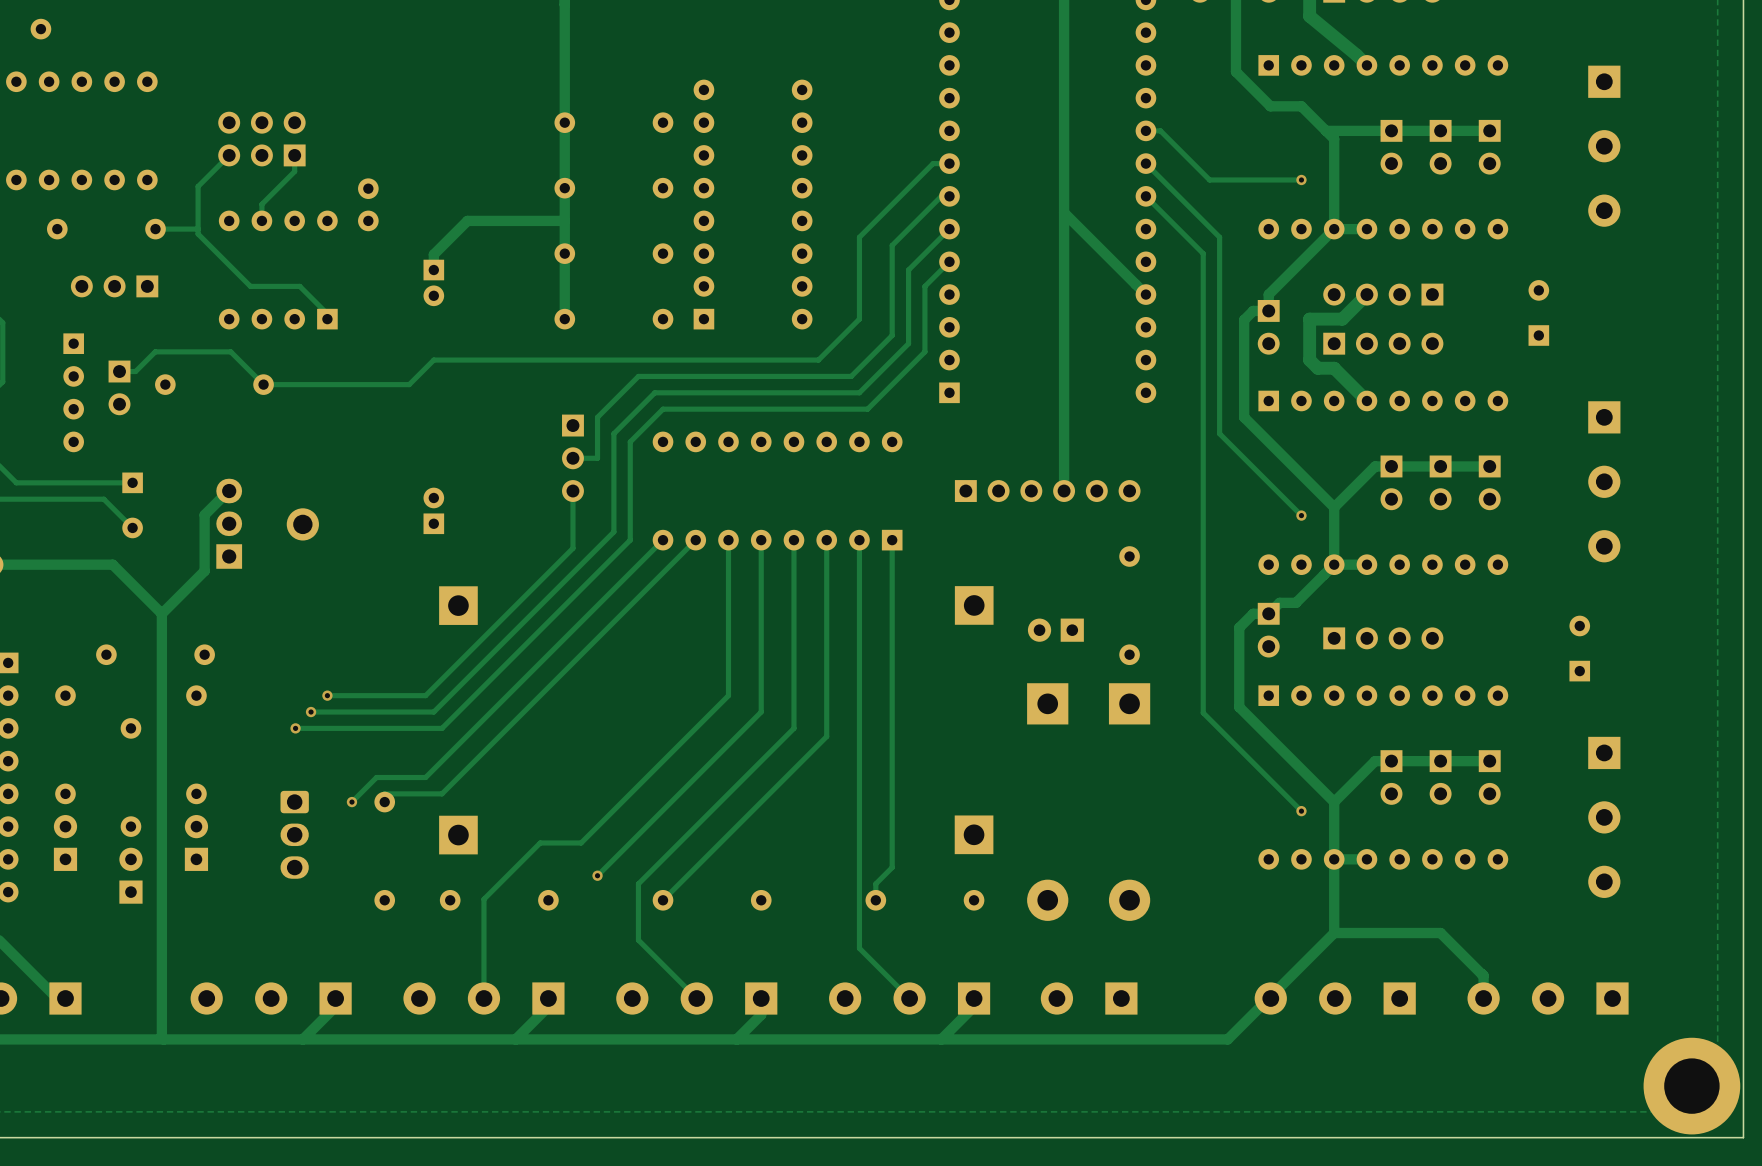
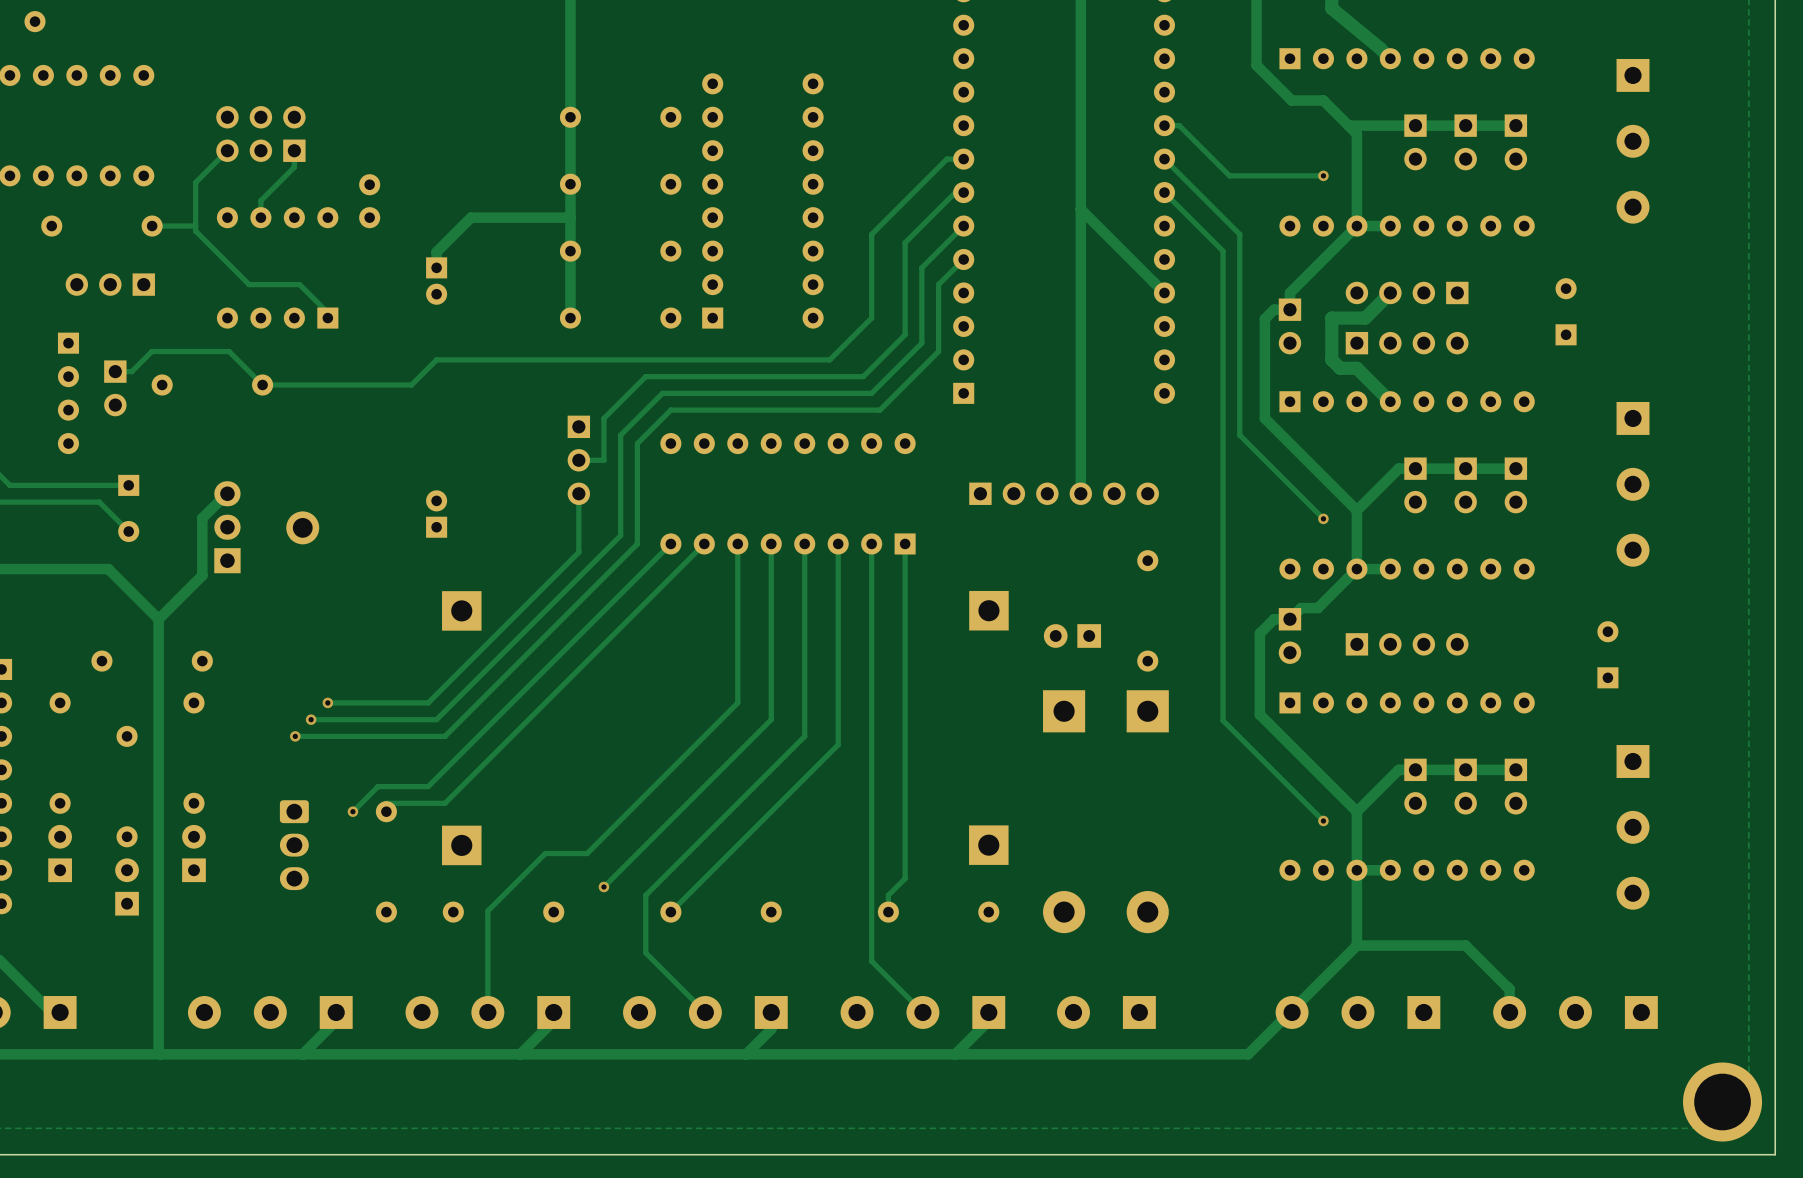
part footprint: [1643, 1037, 1741, 1135] -> [1683, 1062, 1763, 1142]

